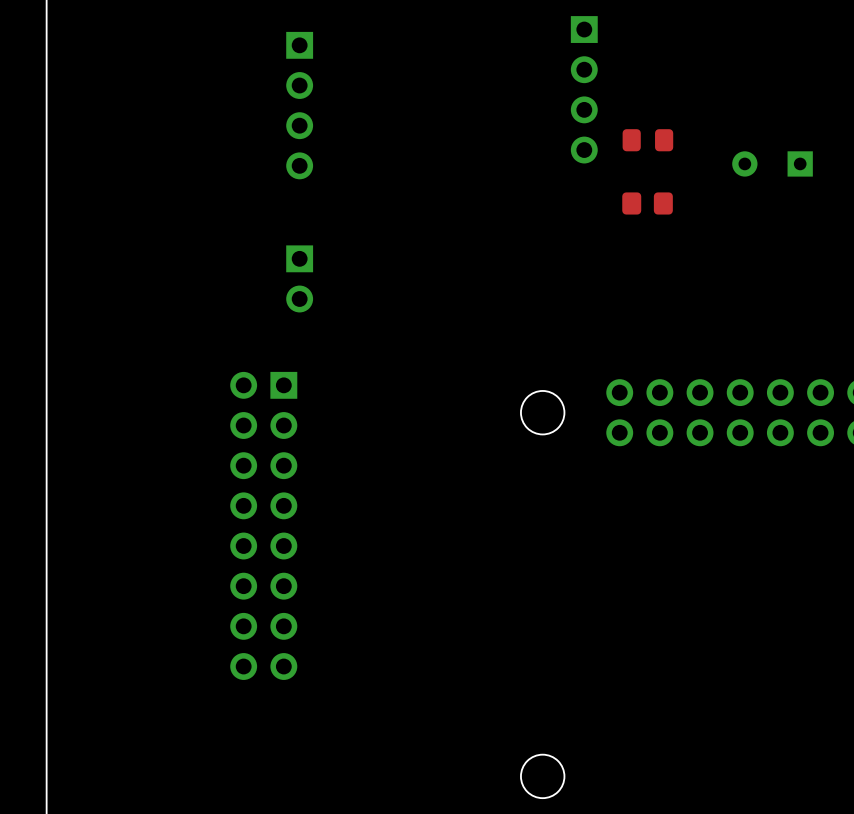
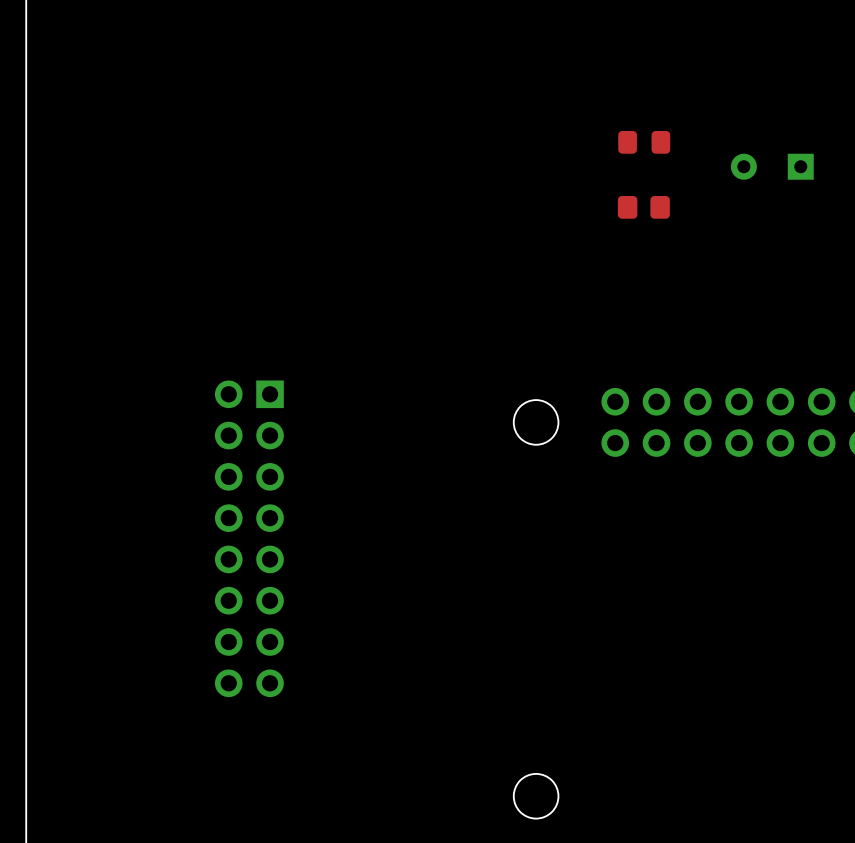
part: (584, 89) -> none
part: (299, 105) -> none
part: (299, 278) -> none

